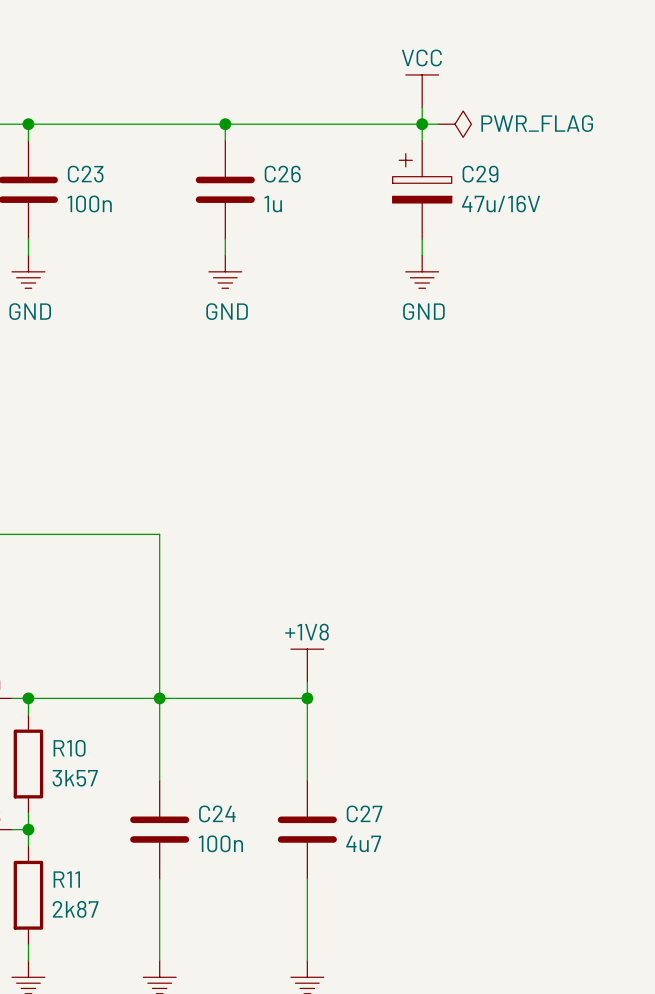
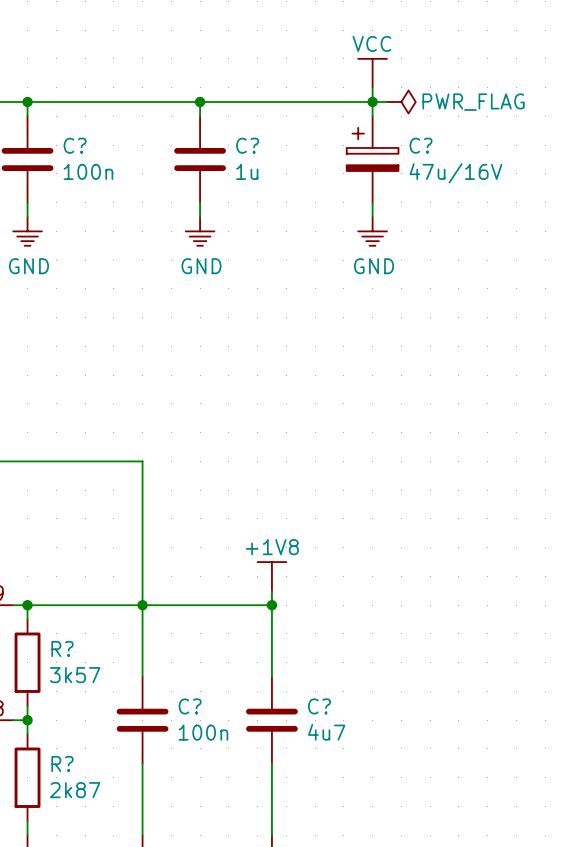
C23 name: C23 (85, 174) -> C? (75, 145)
C26 name: C26 (282, 174) -> C? (247, 145)
C29 name: C29 (480, 174) -> C? (421, 145)
R10 name: R10 (69, 748) -> R? (62, 648)
C24 name: C24 (217, 813) -> C? (190, 706)
C27 name: C27 (364, 813) -> C? (319, 706)
R11 name: R11 (66, 879) -> R? (62, 763)

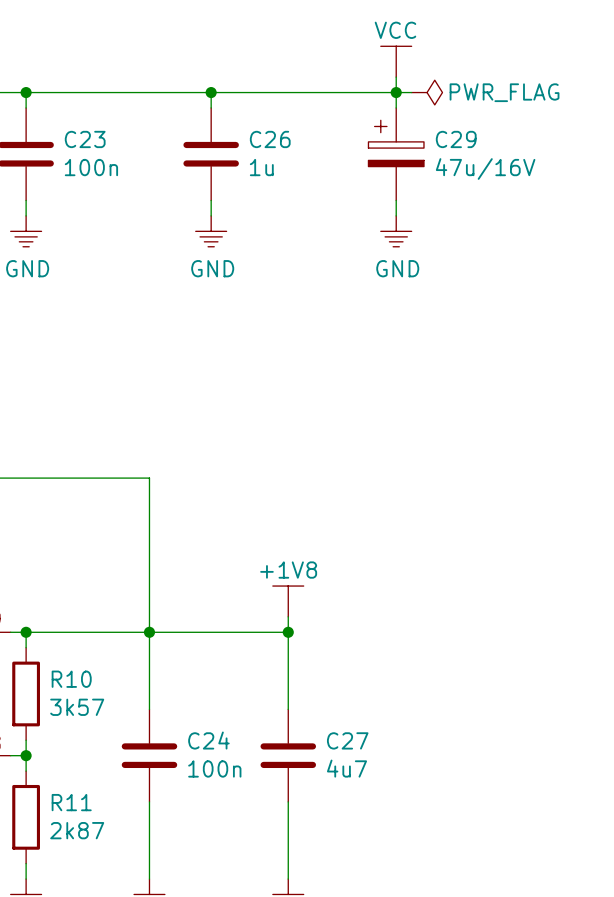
C? name: C? (75, 145) -> C23 (85, 139)
C? name: C? (247, 145) -> C26 (270, 139)
C? name: C? (421, 145) -> C29 (456, 139)
R? name: R? (62, 648) -> R10 (71, 679)
C? name: C? (190, 706) -> C24 (208, 740)
C? name: C? (319, 706) -> C27 (347, 740)
R? name: R? (62, 763) -> R11 (71, 802)

